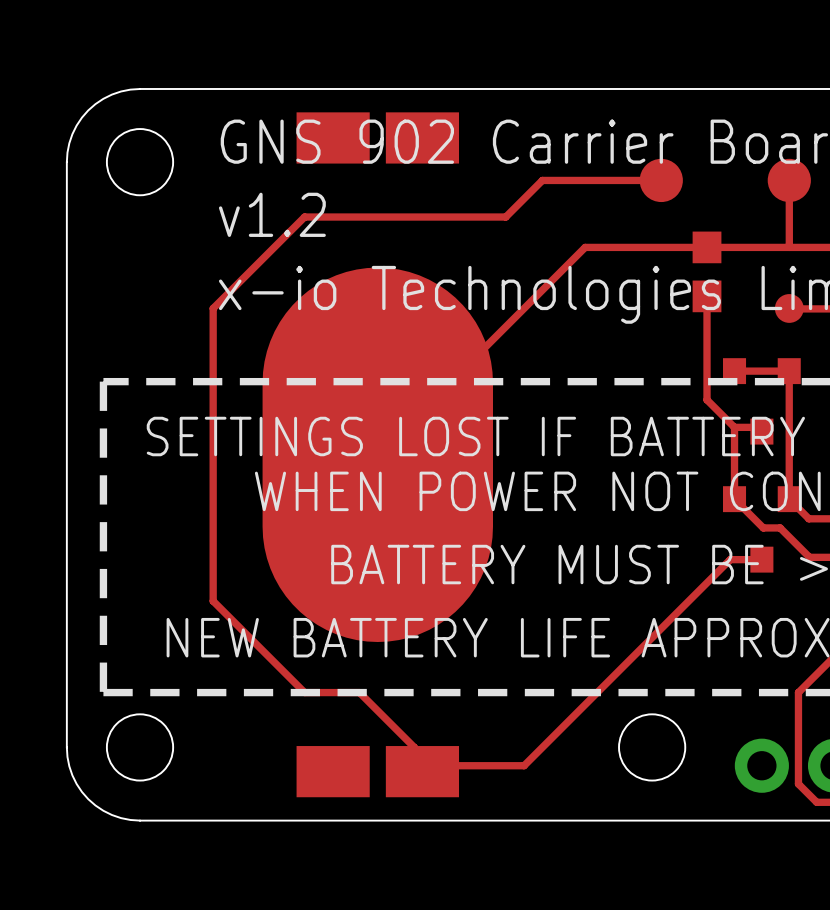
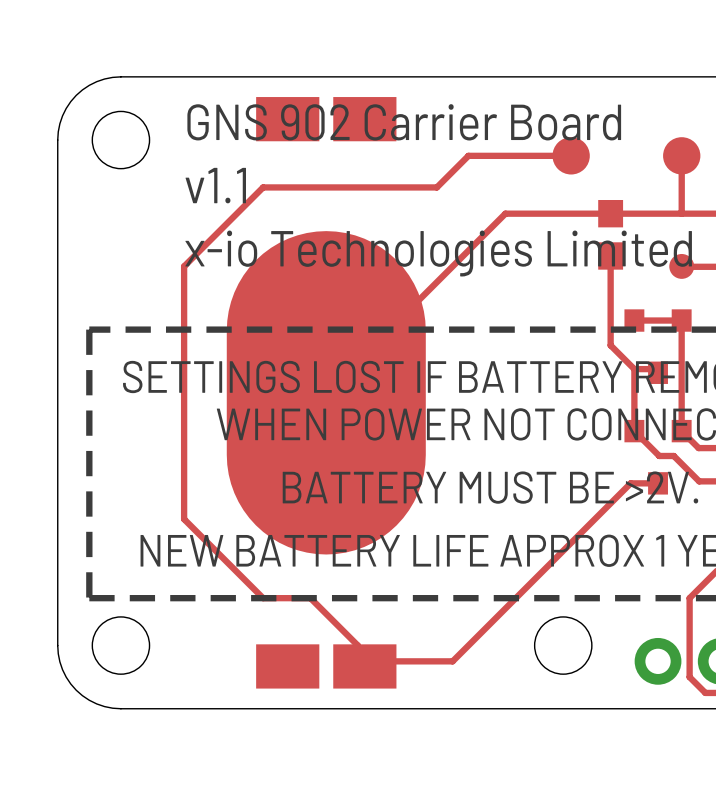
text: v1.2 (272, 214) -> v1.1 (215, 185)

